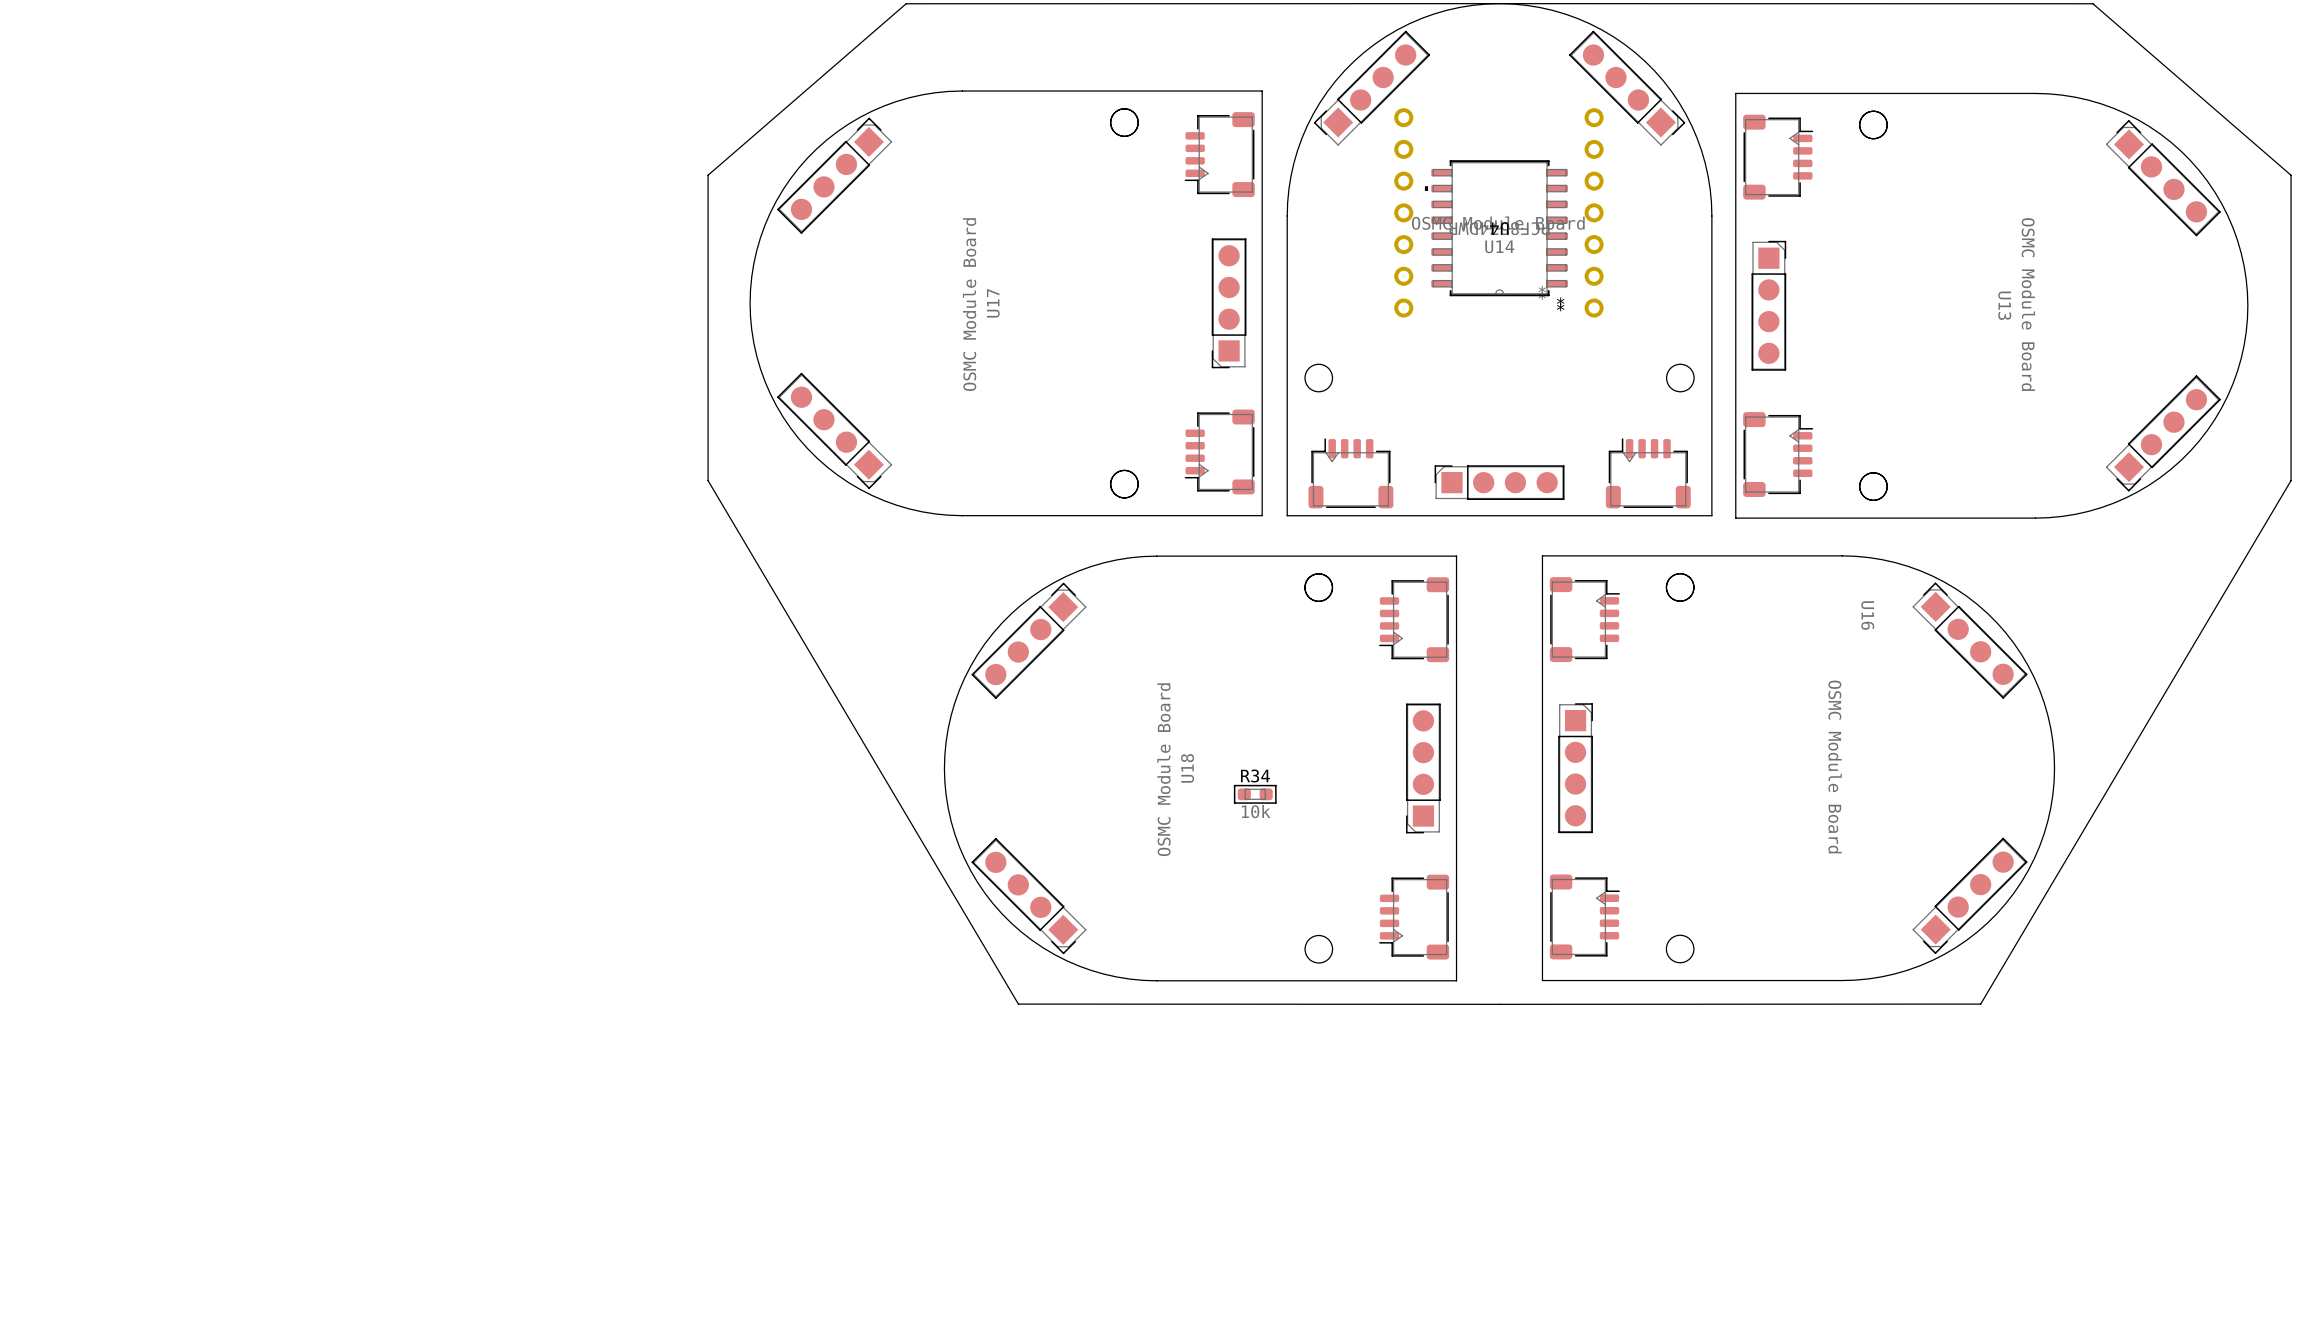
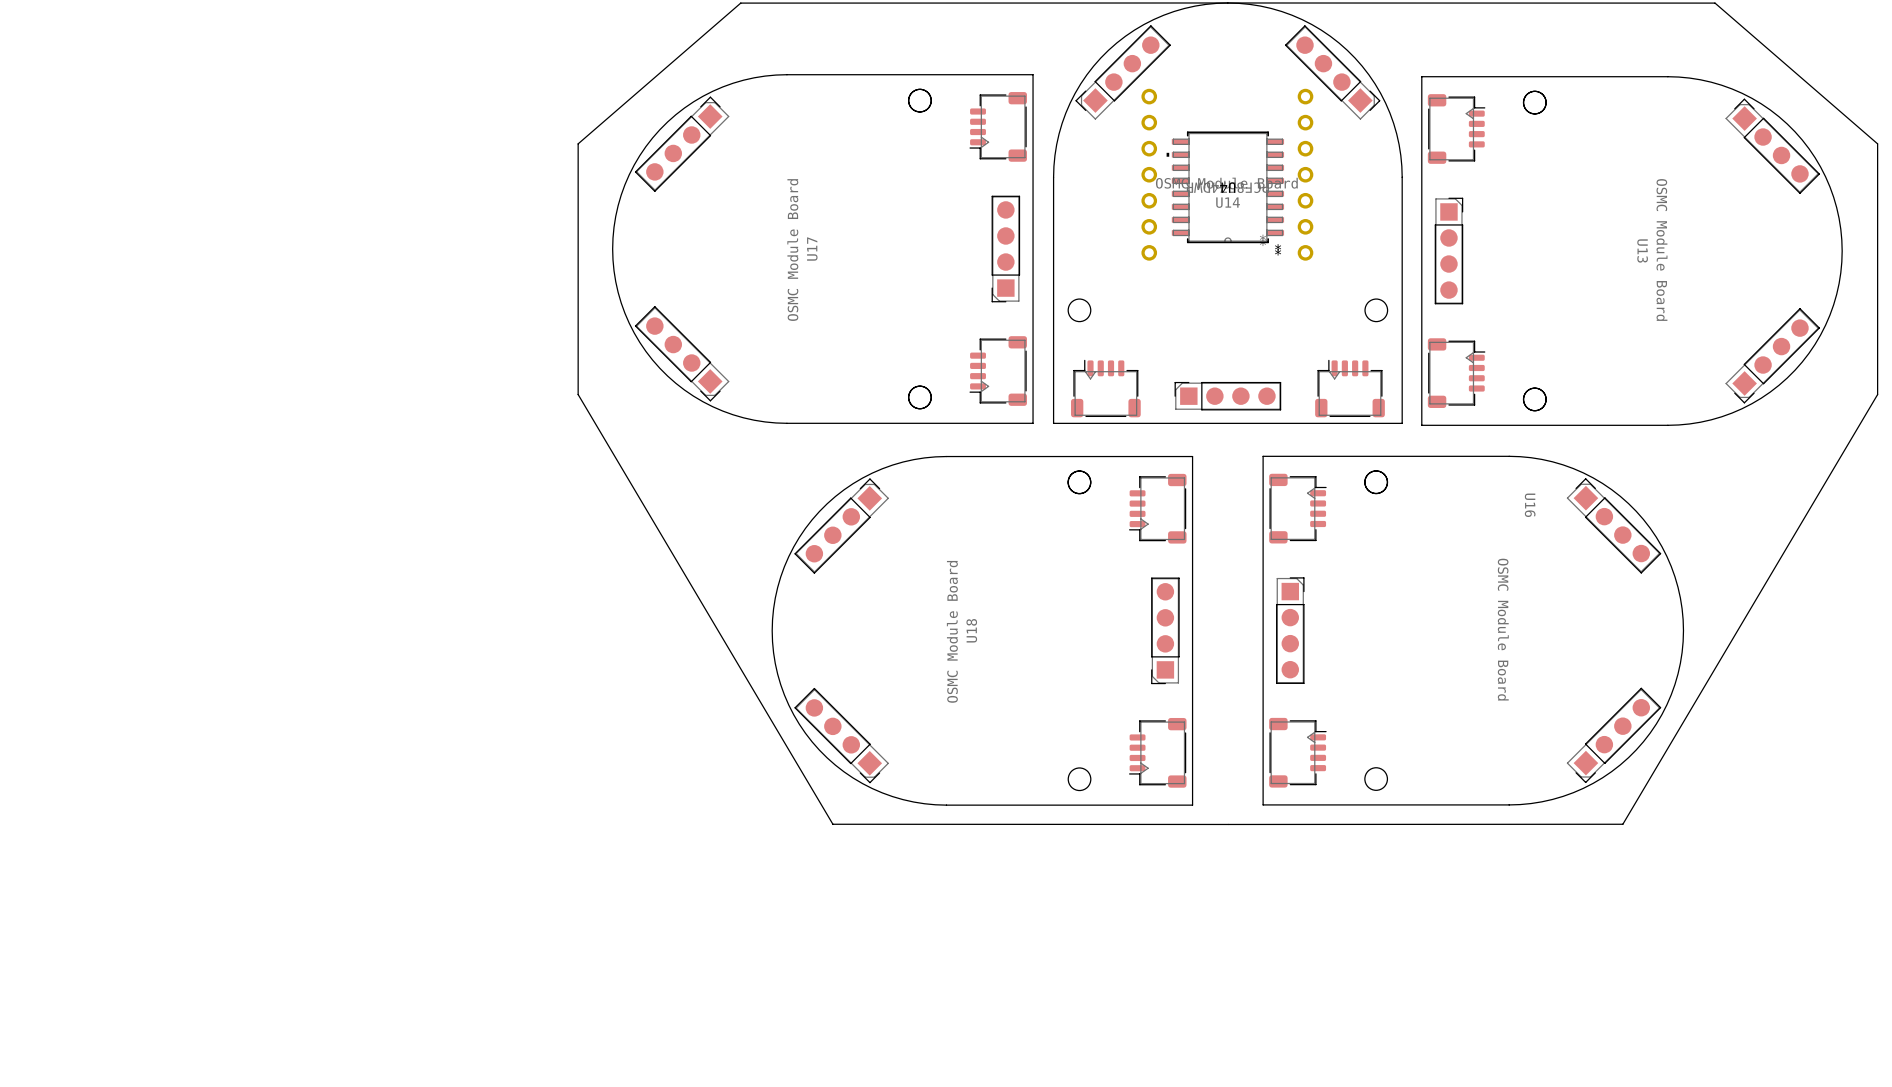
R34: 10k (1255, 794) -> none

